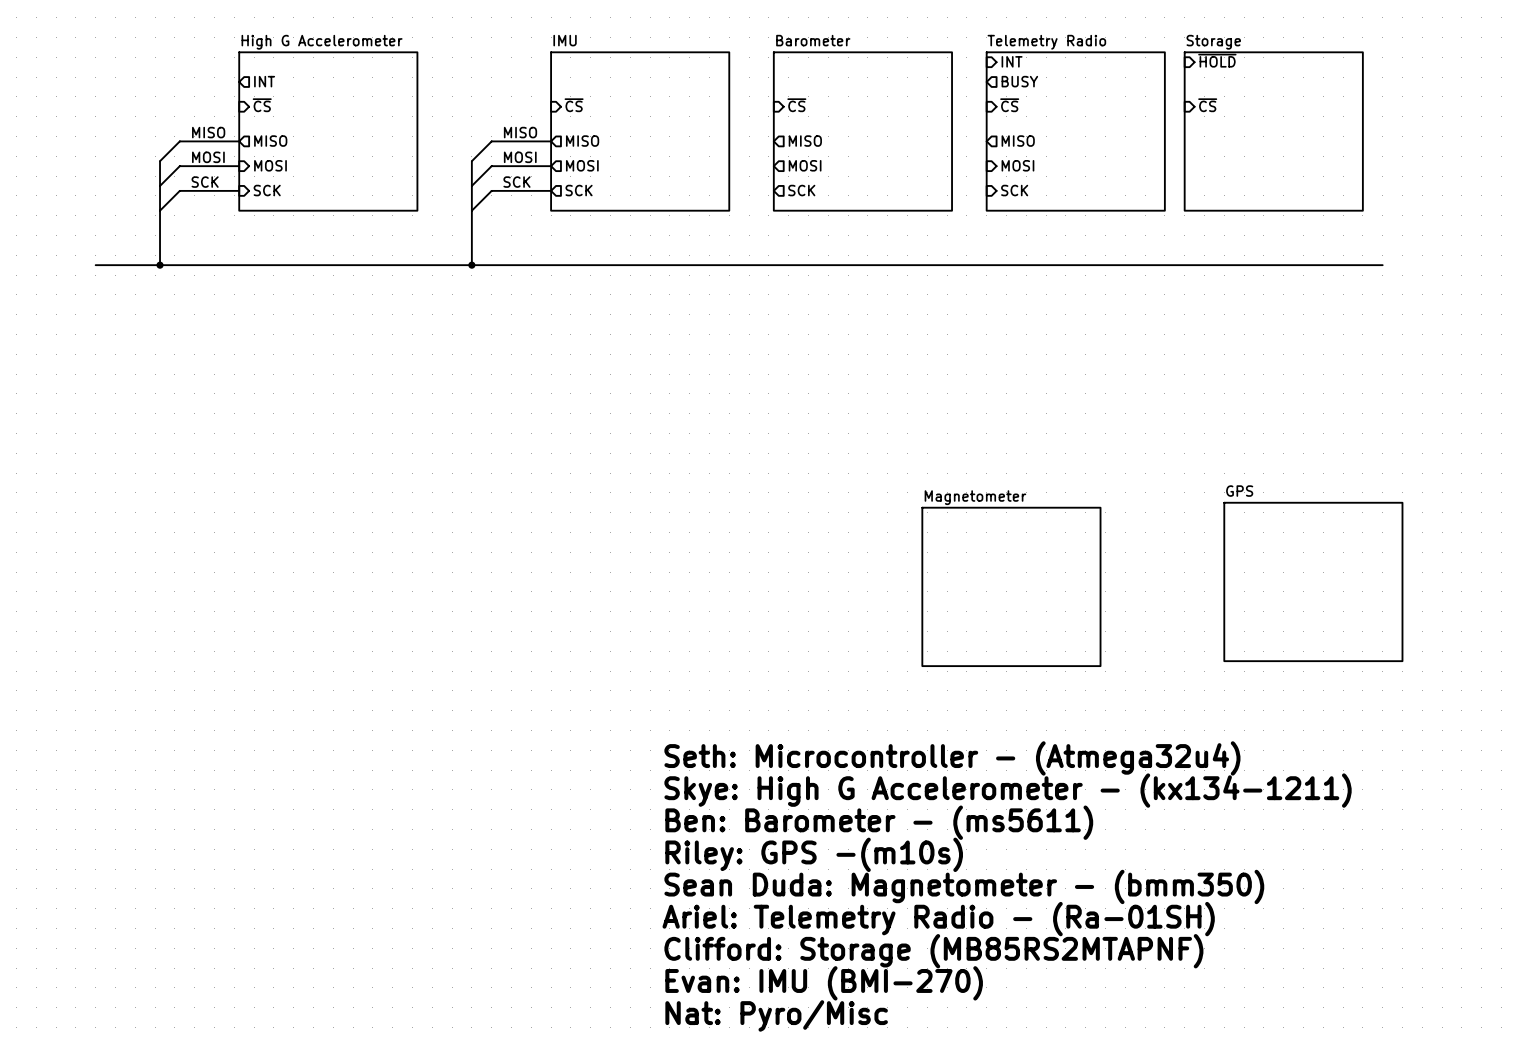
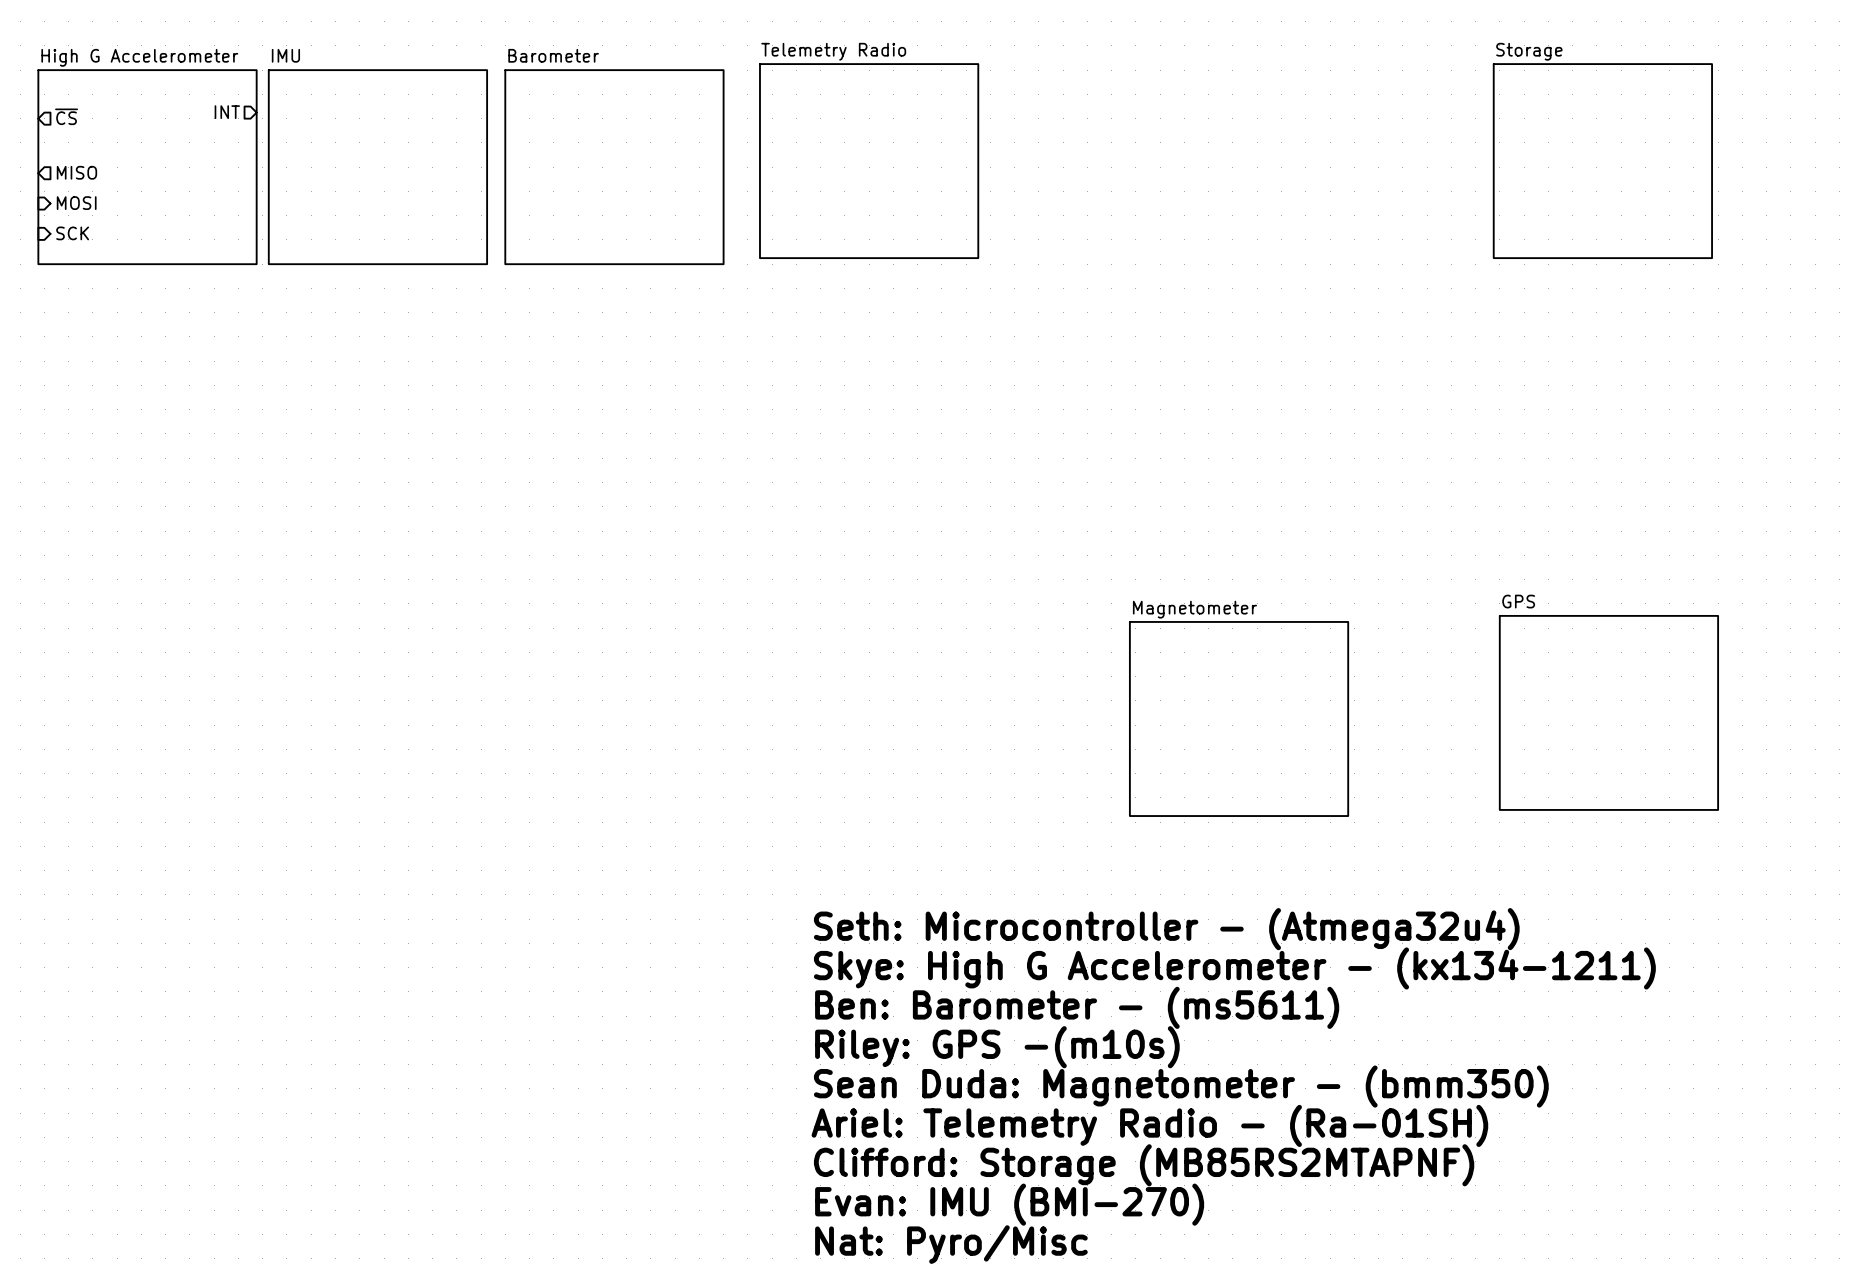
sheet pin: ~{HOLD} (1217, 60) -> none
sheet pin: INT (1012, 61) -> none
sheet pin rotation: 0° (264, 81) -> 180° (227, 112)
sheet pin position: INT (264, 81) -> INT (227, 112)
sheet pin: BUSY (1019, 81) -> none
sheet pin: none -> ~{CS} (66, 116)
sheet pin: ~{CS} (262, 105) -> none
sheet pin: ~{CS} (574, 105) -> none
sheet pin: ~{CS} (796, 105) -> none
sheet pin: ~{CS} (1009, 105) -> none
sheet pin: ~{CS} (1207, 105) -> none
sheet High G Accelerometer: (328, 131) -> none
sheet IMU: (640, 131) -> none
sheet Telemetry Radio: none -> (869, 161)
sheet Barometer: (862, 131) -> none
sheet Telemetry Radio: (1075, 131) -> none
sheet Storage position: (1273, 131) -> (1602, 161)
label: MISO (208, 132) -> none
label: MISO (520, 132) -> none
sheet High G Accelerometer: none -> (147, 167)
sheet IMU: none -> (377, 167)
sheet Barometer: none -> (614, 167)
sheet pin: none -> MISO (76, 172)
wire: (239, 141) (179, 141) (160, 161) -> none
sheet pin: MISO (270, 141) -> none
wire: (551, 141) (491, 141) (471, 161) -> none
sheet pin: MISO (582, 141) -> none
sheet pin: MISO (805, 141) -> none
sheet pin: MISO (1018, 141) -> none
label: MOSI (208, 157) -> none
label: MOSI (520, 157) -> none
bus: (160, 161) (160, 265) -> none
bus: (471, 161) (471, 265) -> none
sheet pin: none -> MOSI (76, 203)
sheet pin: MOSI (270, 165) -> none
sheet pin: MOSI (582, 165) -> none
sheet pin: MOSI (805, 165) -> none
sheet pin: MOSI (1017, 165) -> none
wire: (239, 166) (179, 166) (160, 185) -> none
wire: (551, 166) (491, 166) (471, 185) -> none
label: SCK (205, 182) -> none
label: SCK (516, 182) -> none
sheet pin: none -> SCK (72, 233)
wire: (239, 190) (179, 190) (160, 210) -> none
sheet pin: SCK (267, 190) -> none
wire: (551, 190) (491, 190) (471, 210) -> none
sheet pin: SCK (579, 190) -> none
sheet pin: SCK (801, 190) -> none
sheet pin: SCK (1014, 190) -> none
bus: (95, 265) (1382, 265) -> none
junction: (160, 265) -> none
junction: (471, 265) -> none

